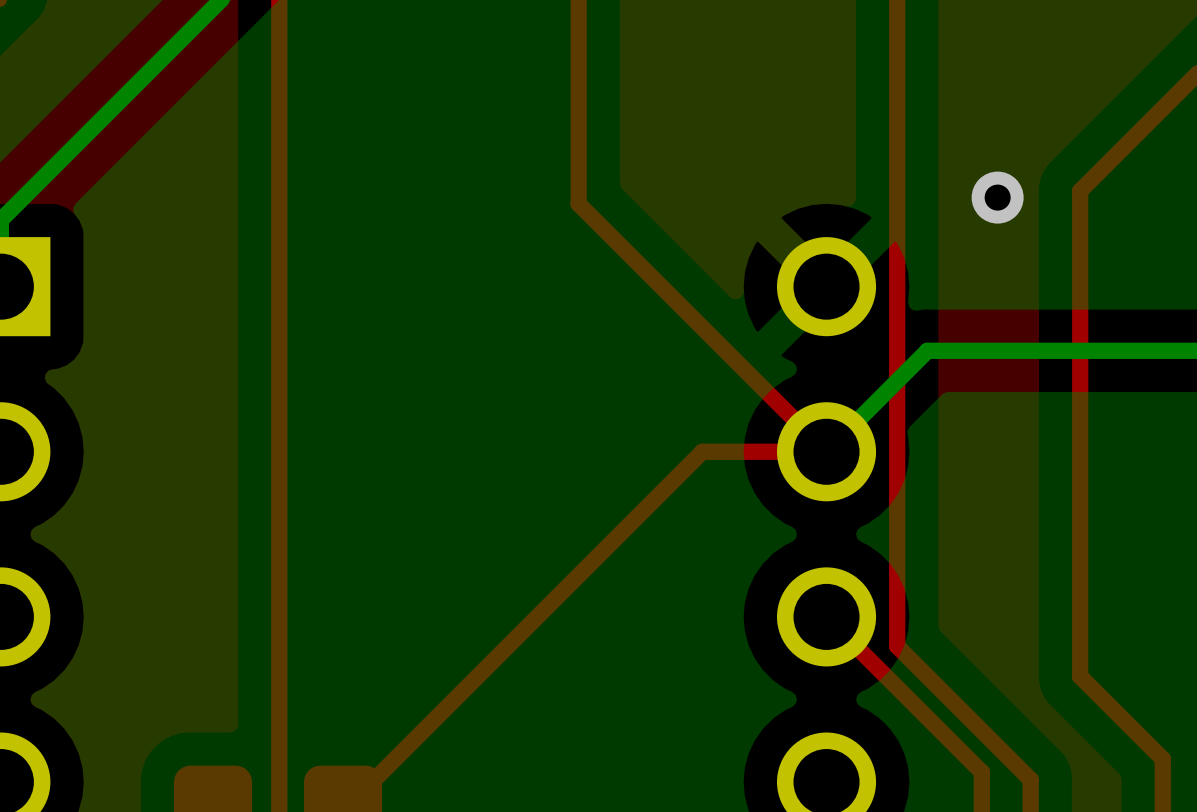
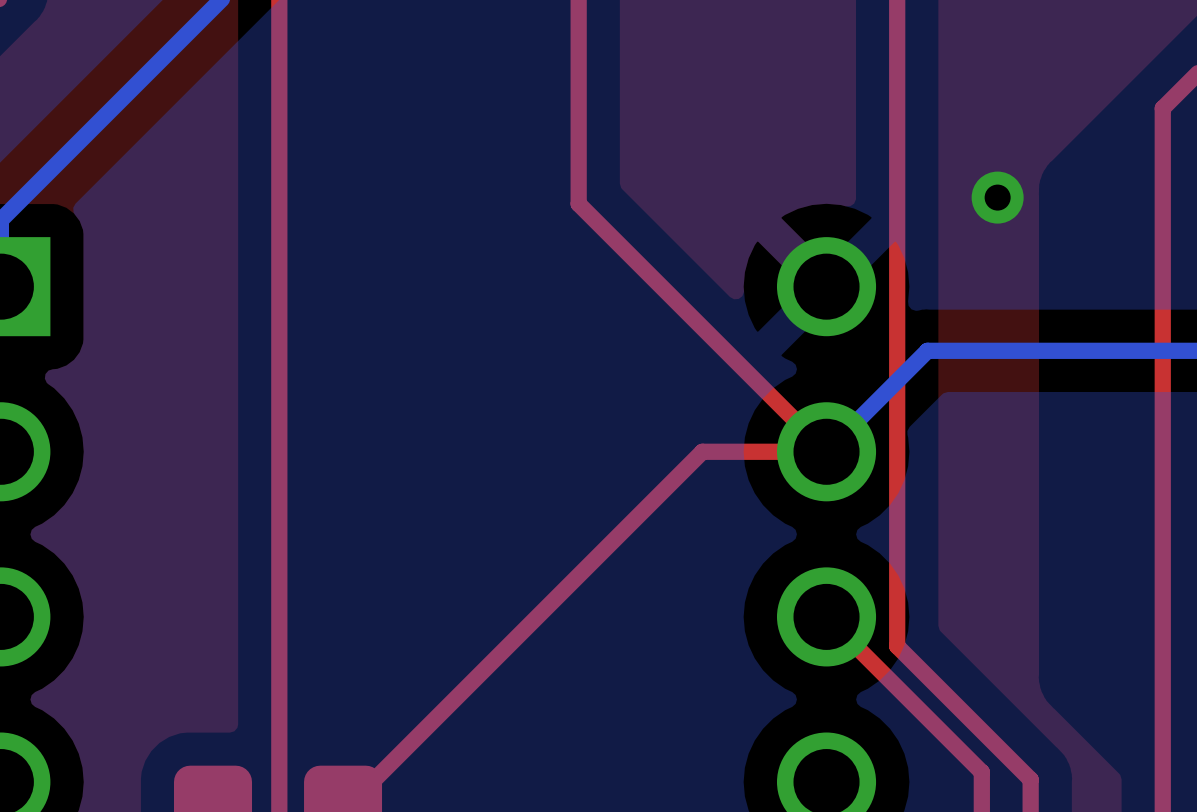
top track: (1162, 108) (1080, 190) (1080, 676) (1162, 759) -> (1162, 108) (1162, 759)

